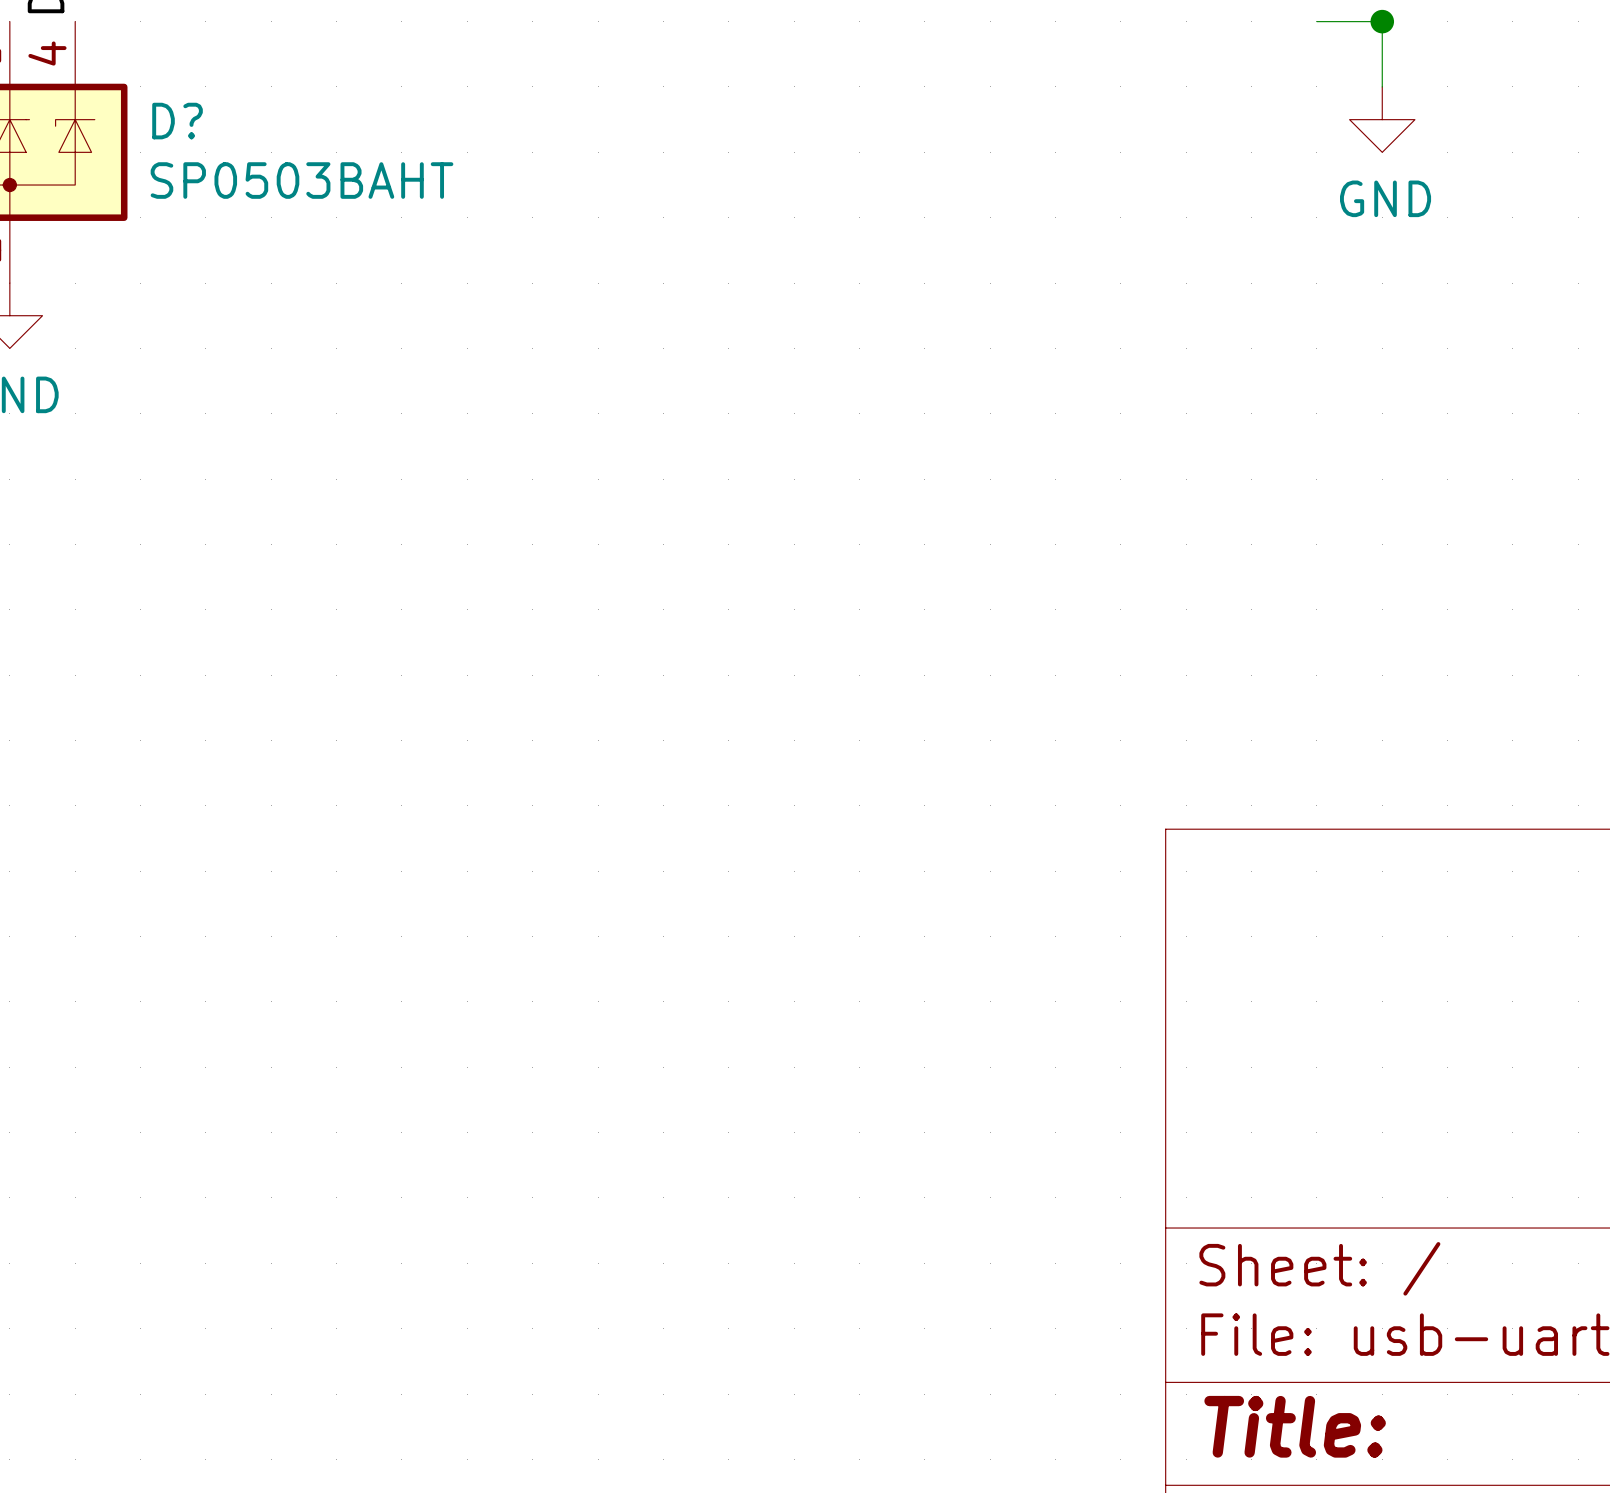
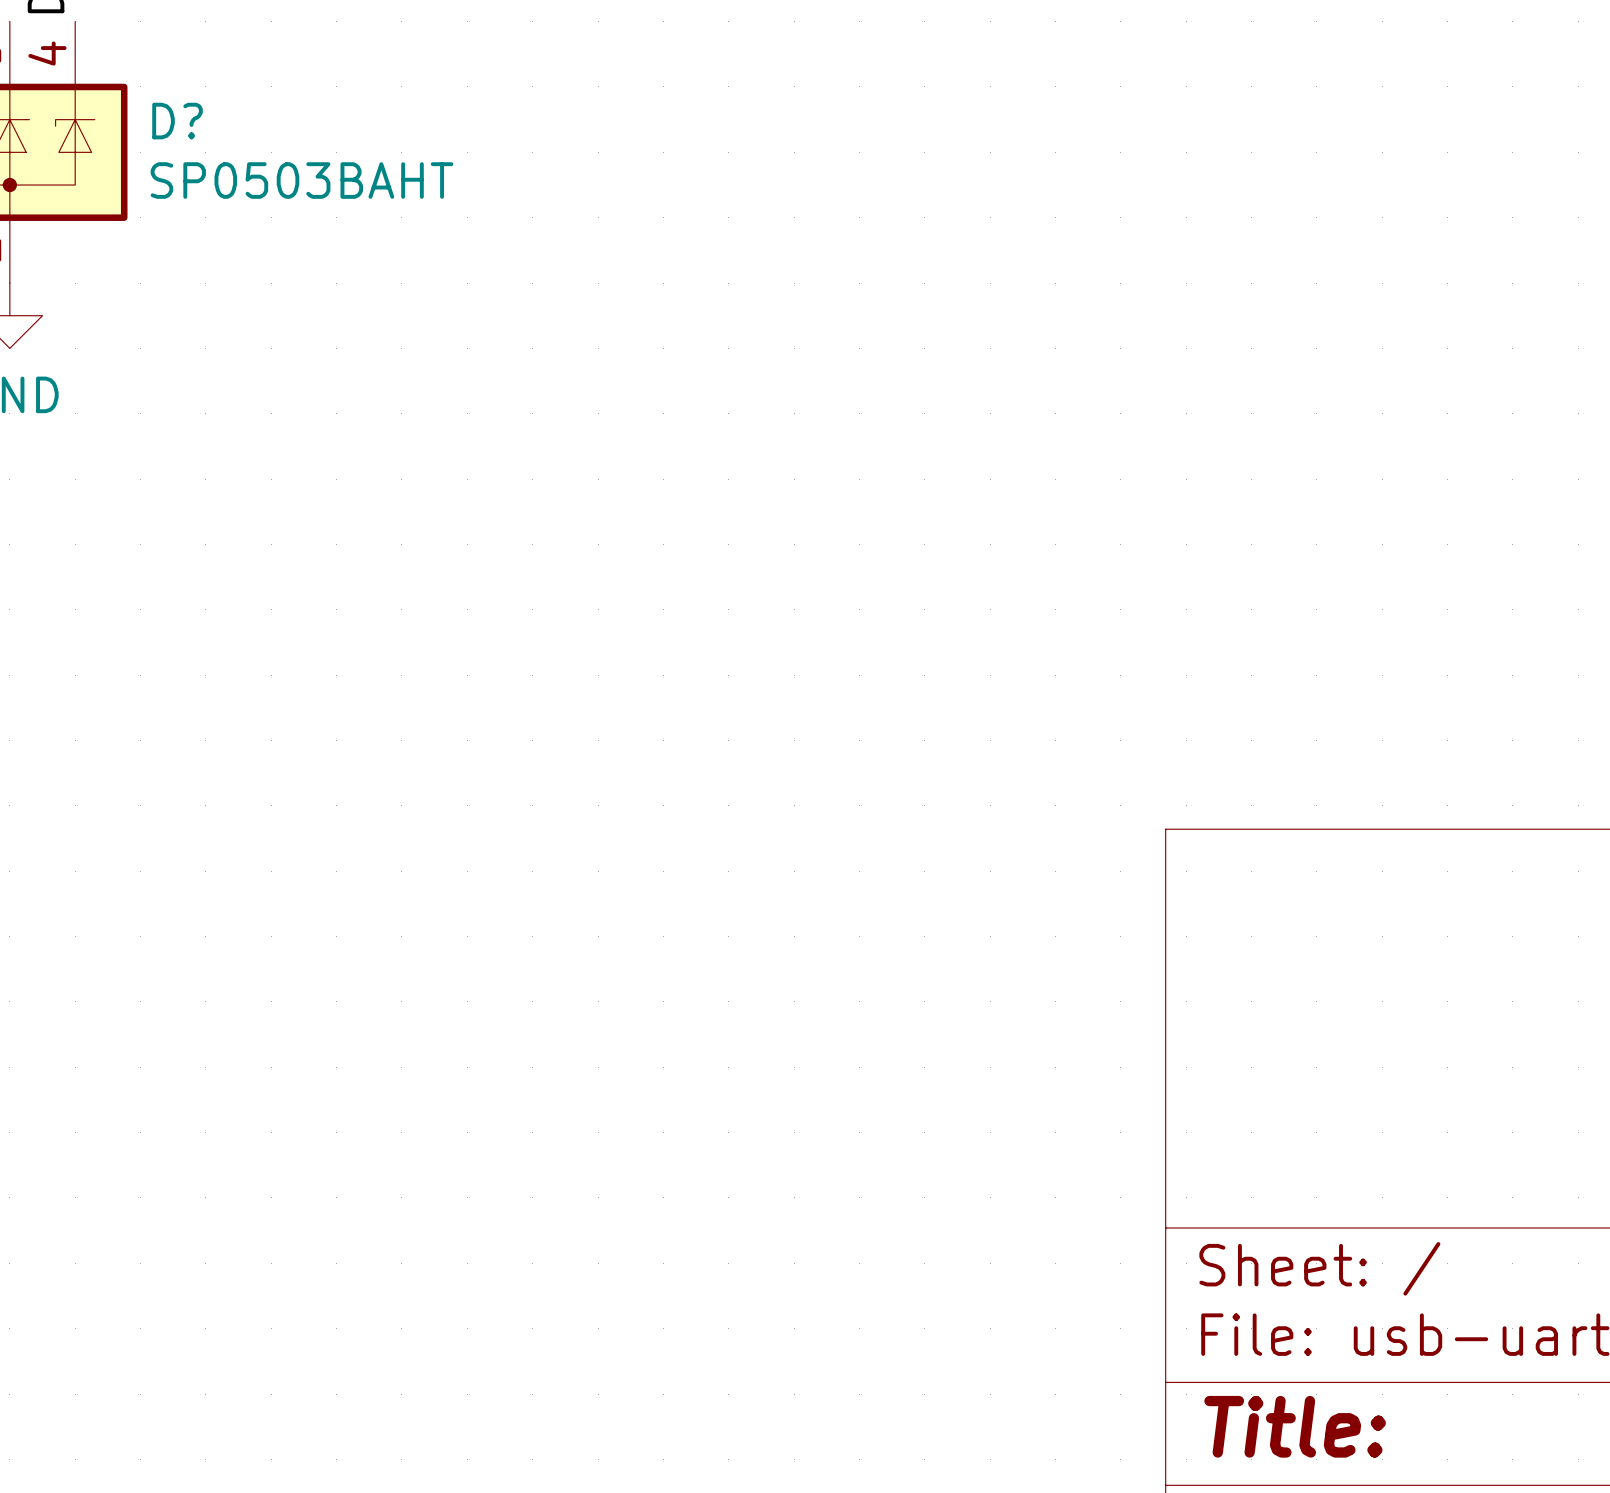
wire: (1316, 21) (1382, 21) (1382, 86) -> none
junction: (1382, 21) -> none
power symbol: GND (1382, 119) -> none

